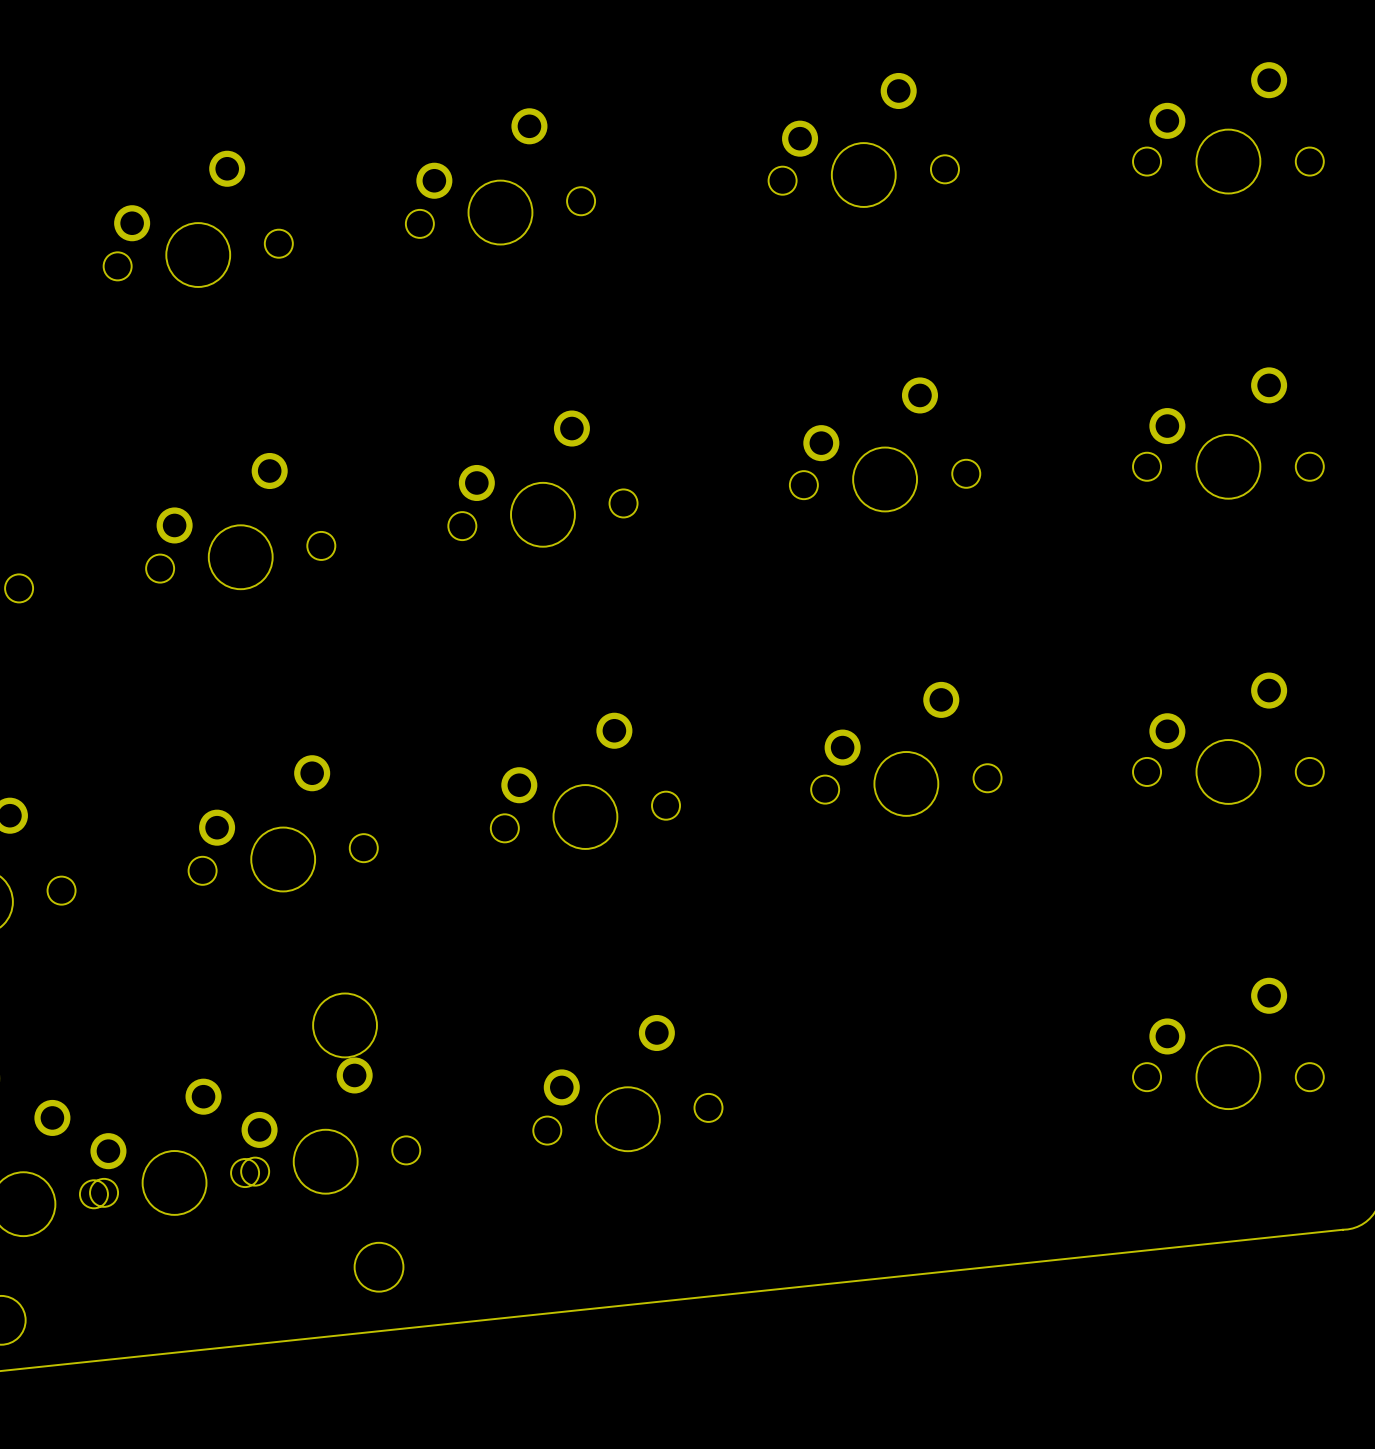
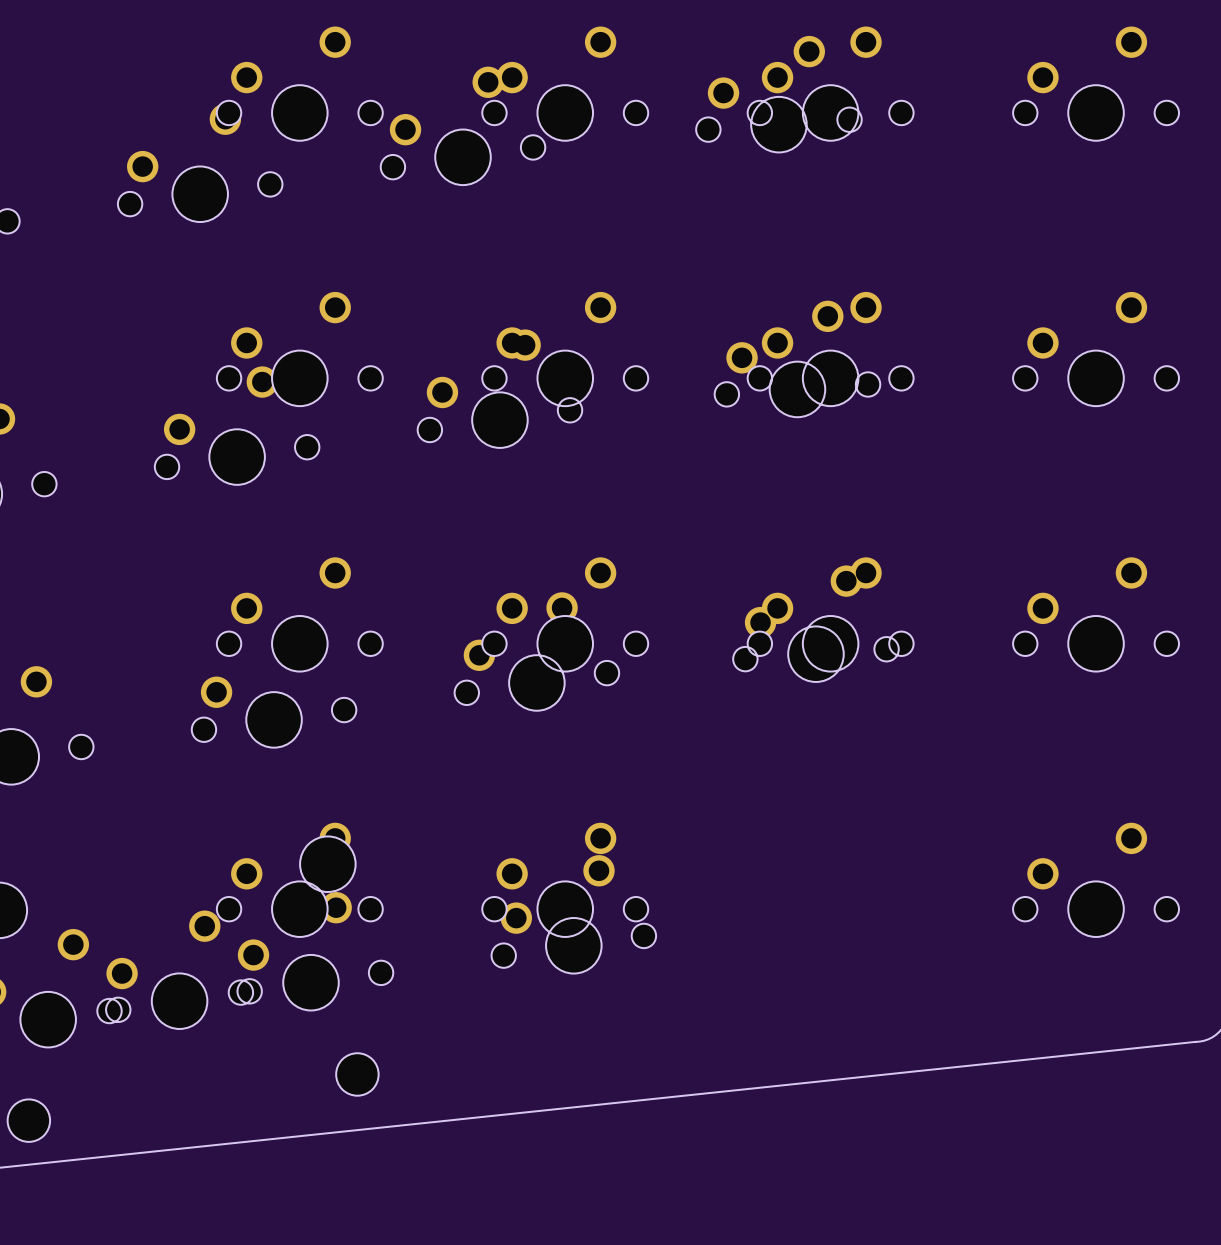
part: none -> (299, 83)
part: none -> (565, 83)
part: none -> (830, 83)
part: none -> (299, 349)
part: none -> (565, 349)
part: none -> (830, 349)
part: none -> (299, 614)
part: none -> (565, 614)
part: none -> (830, 614)
part: none -> (299, 879)
part: none -> (565, 879)

